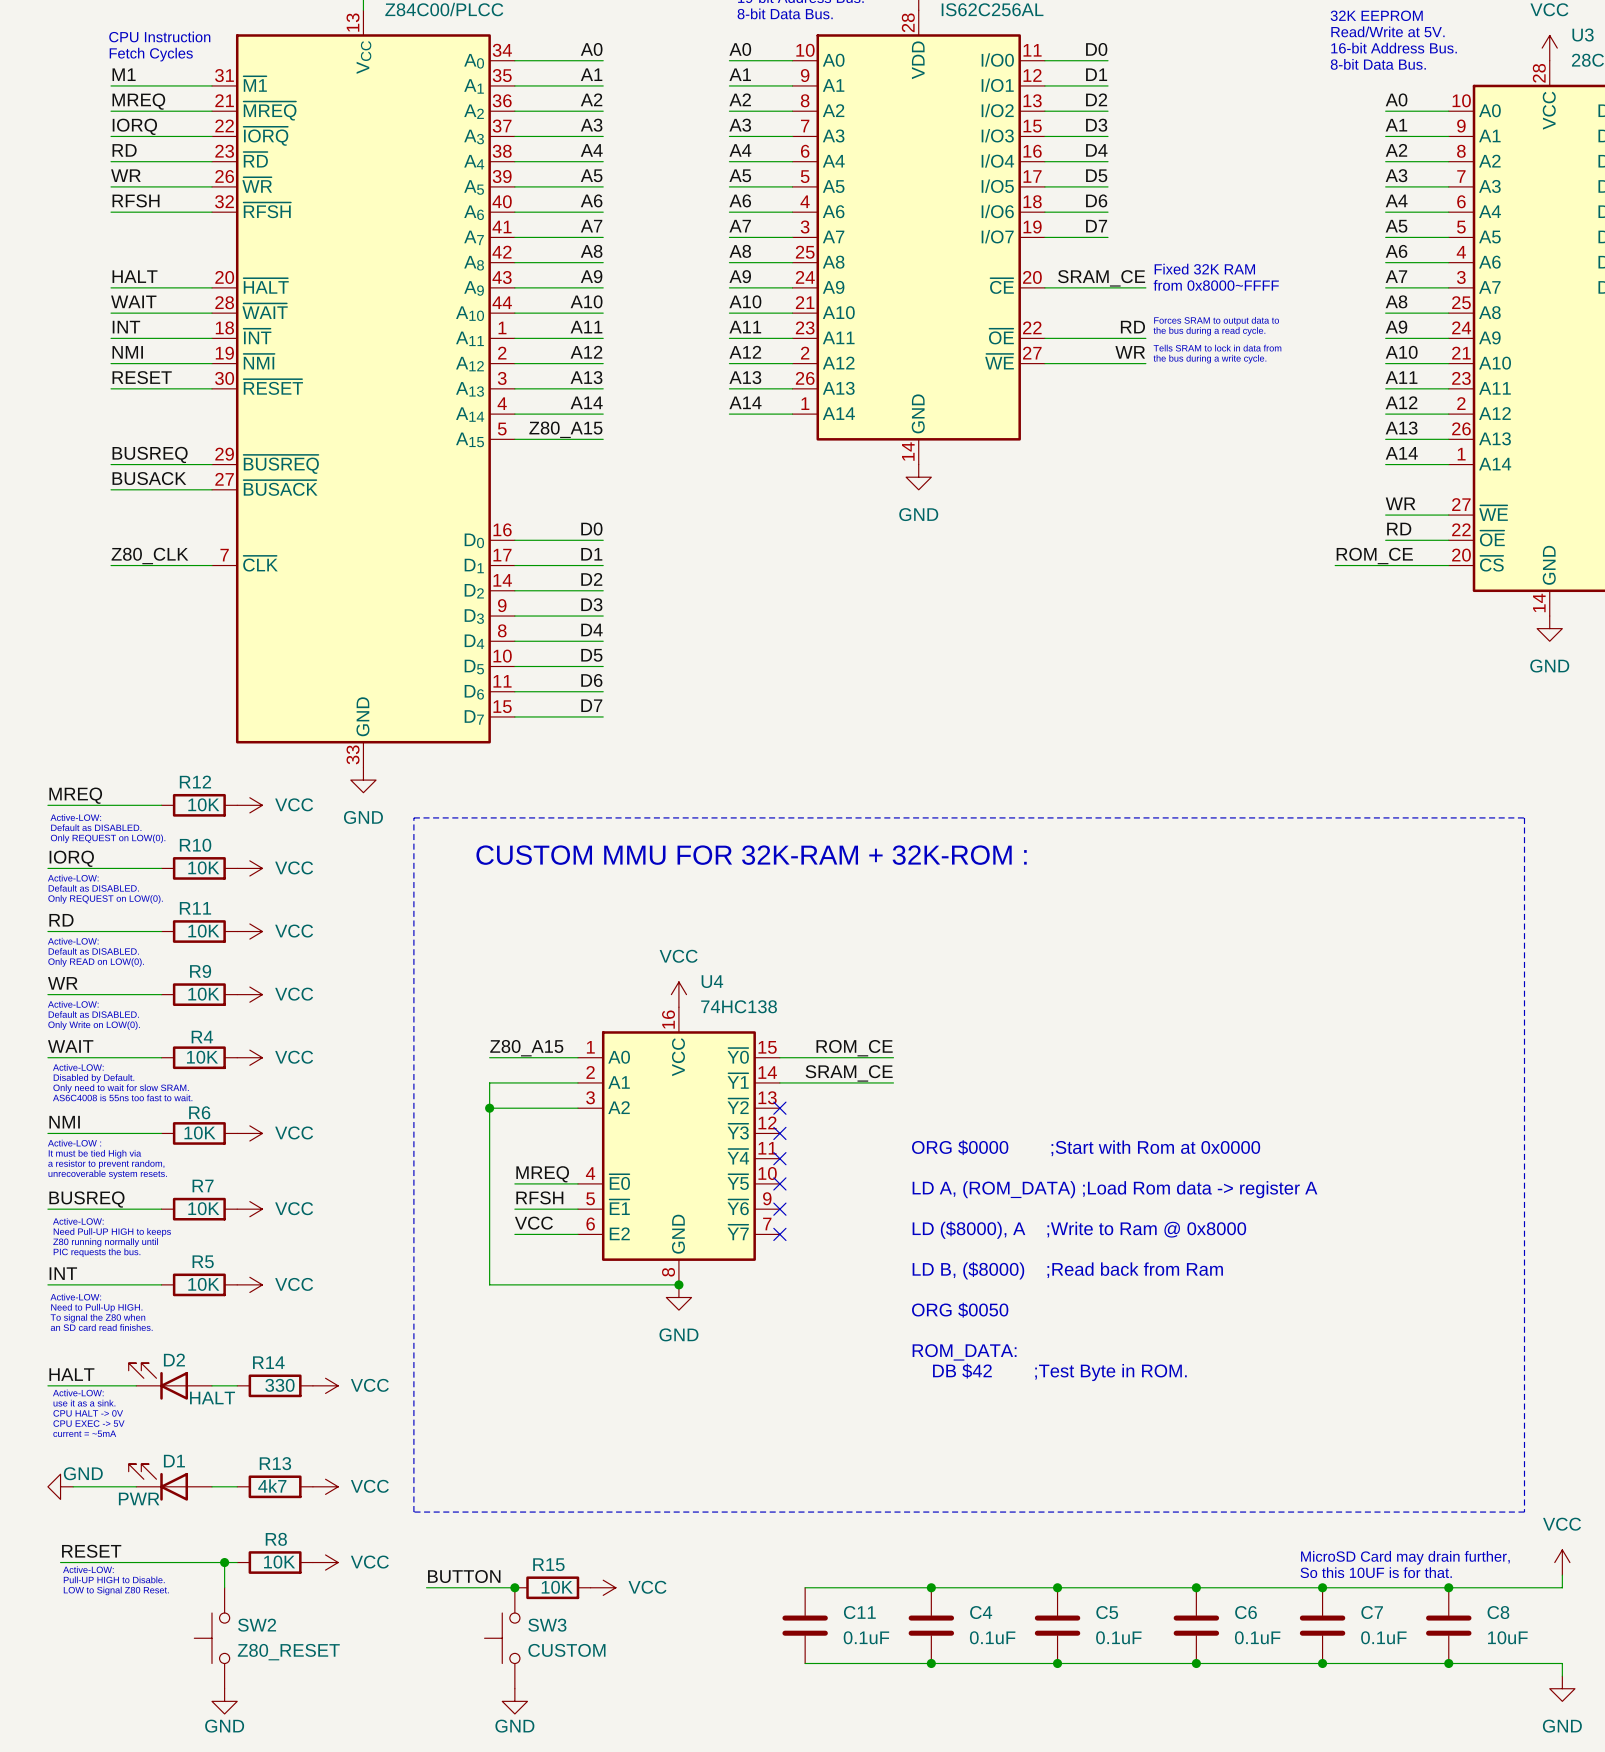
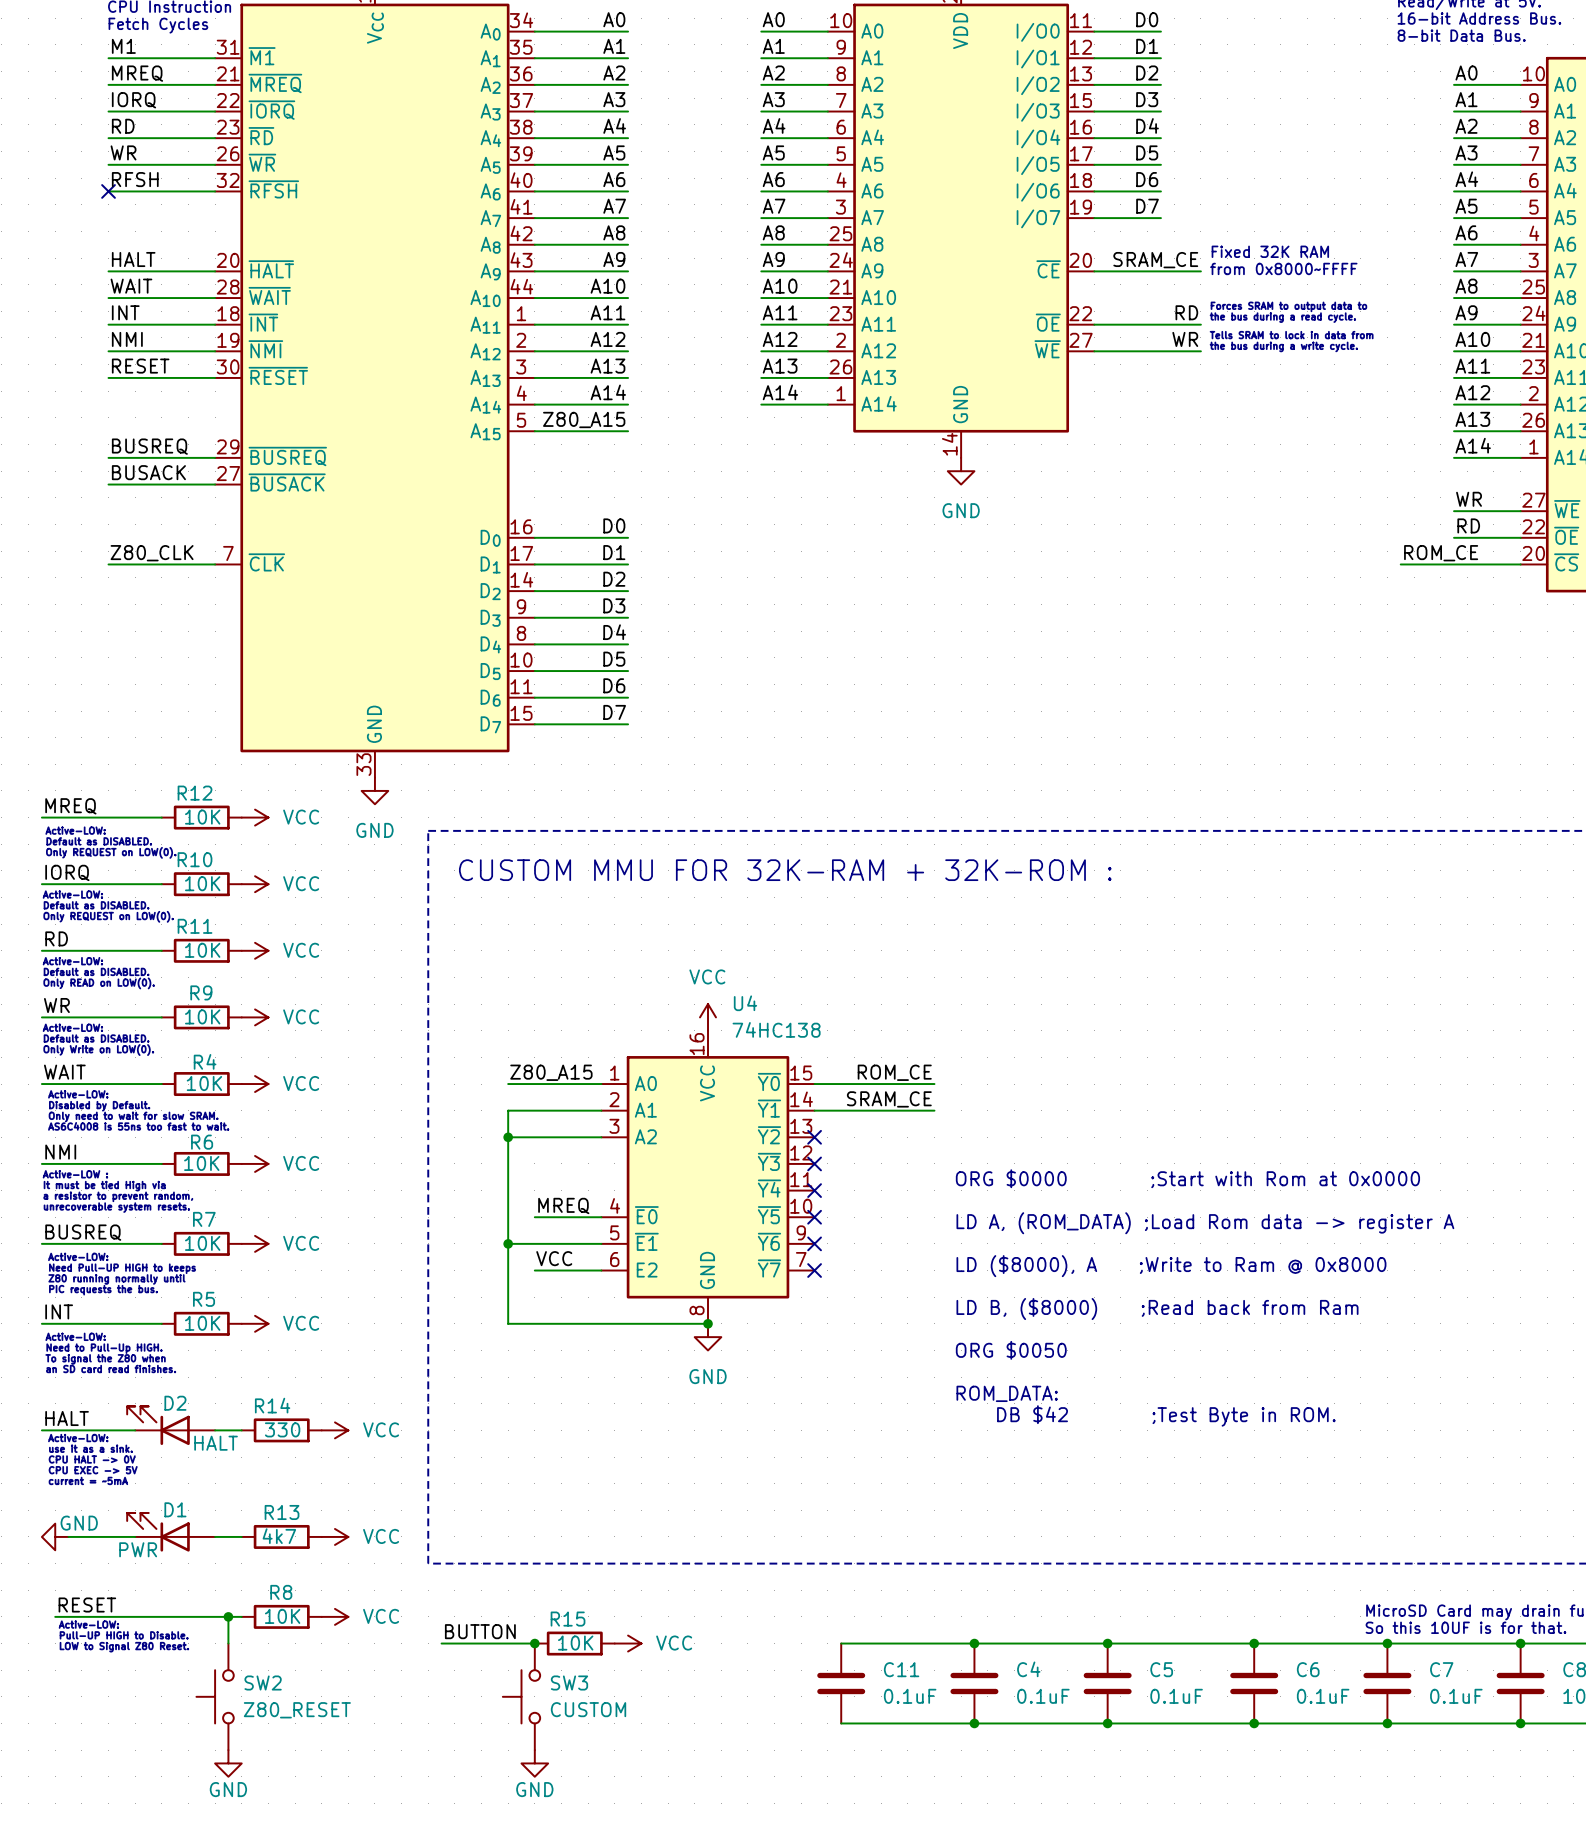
no-connect mark: none -> (108, 191)
label: RFSH (539, 1197) -> none
wire: none -> (508, 1243) (534, 1243)
junction: none -> (508, 1243)

